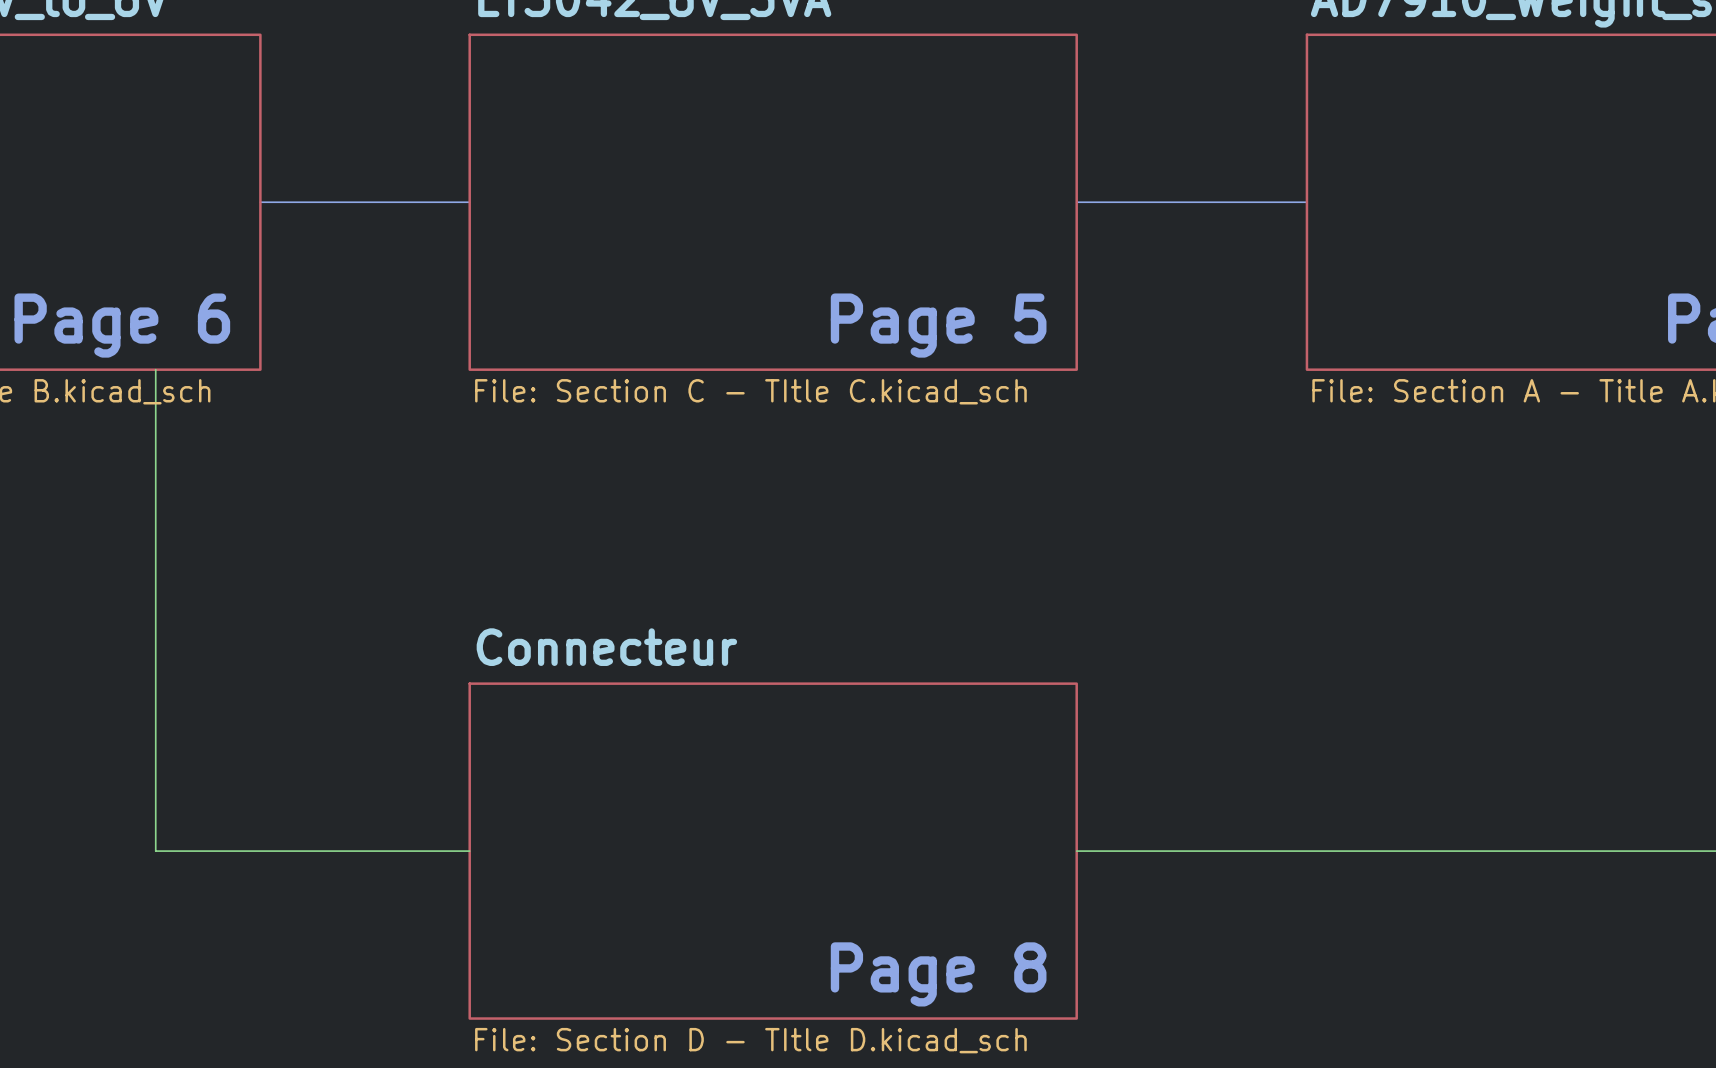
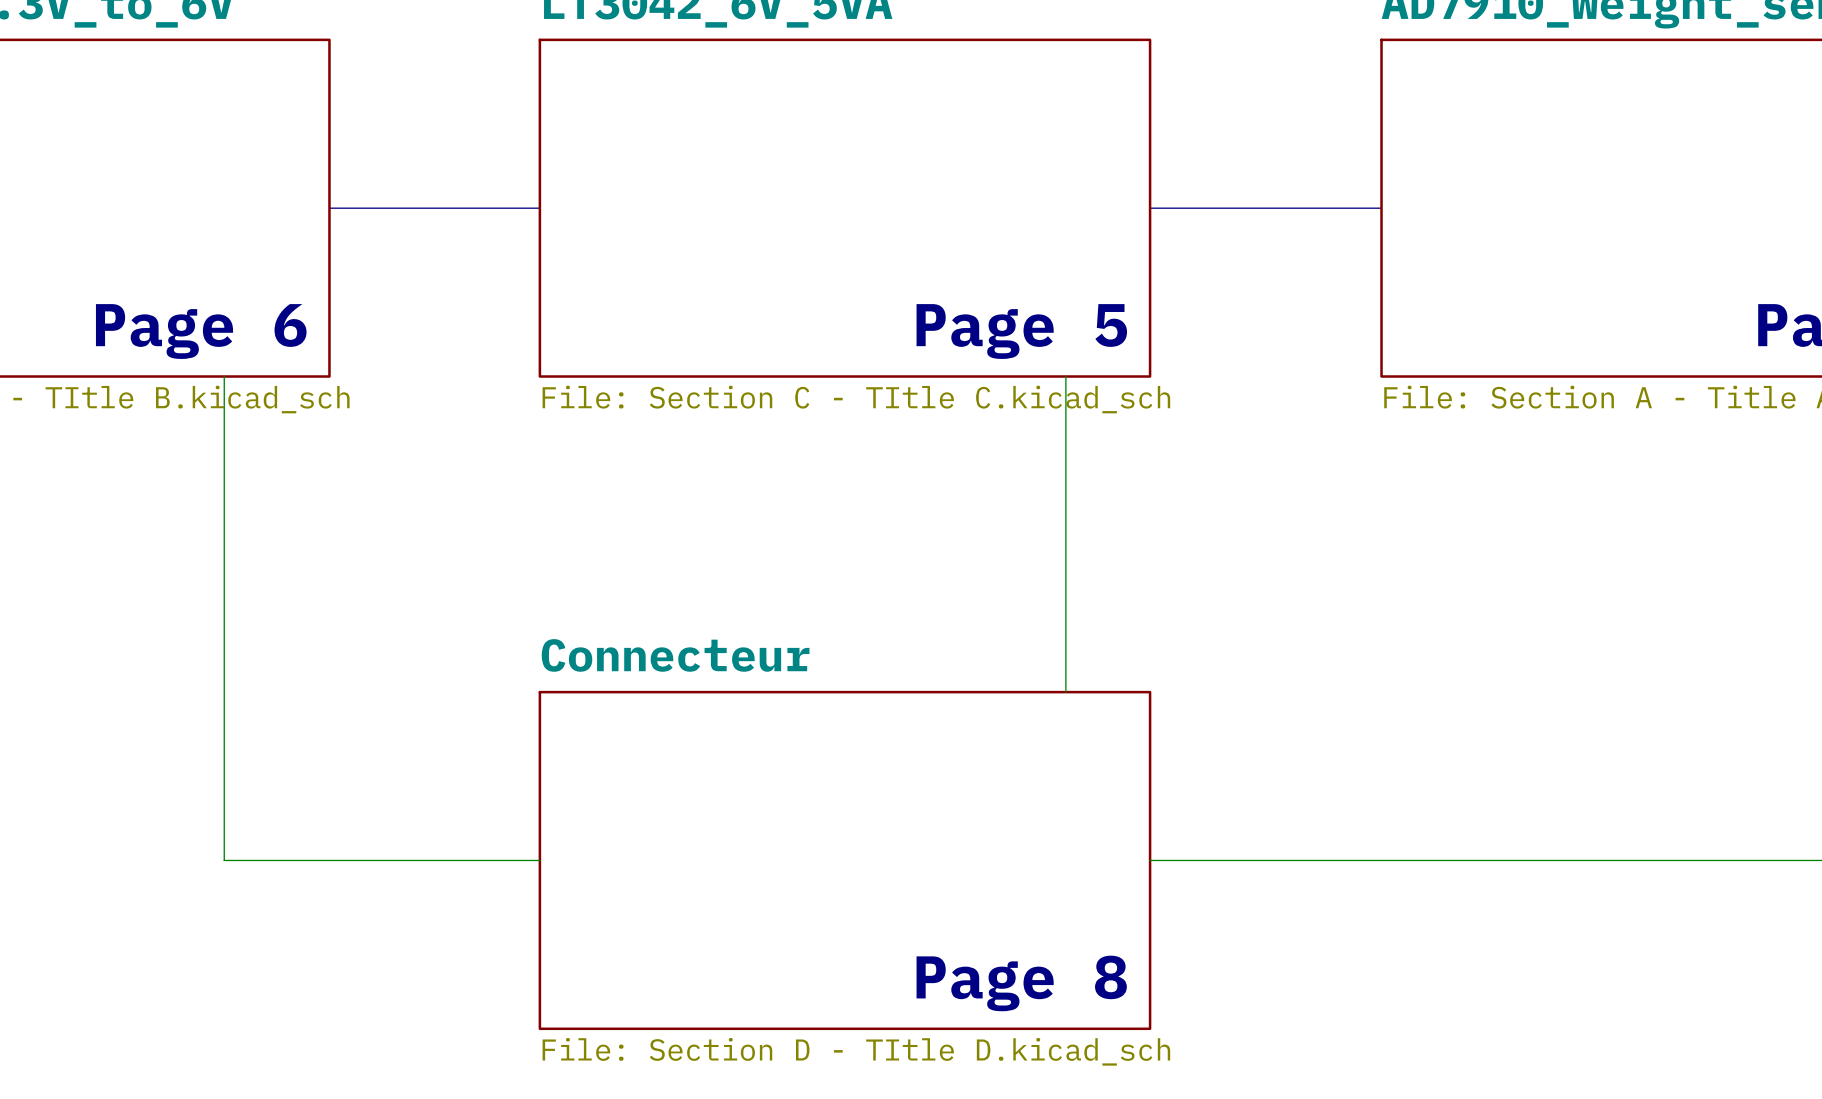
wire: none -> (1065, 376) (1065, 692)

